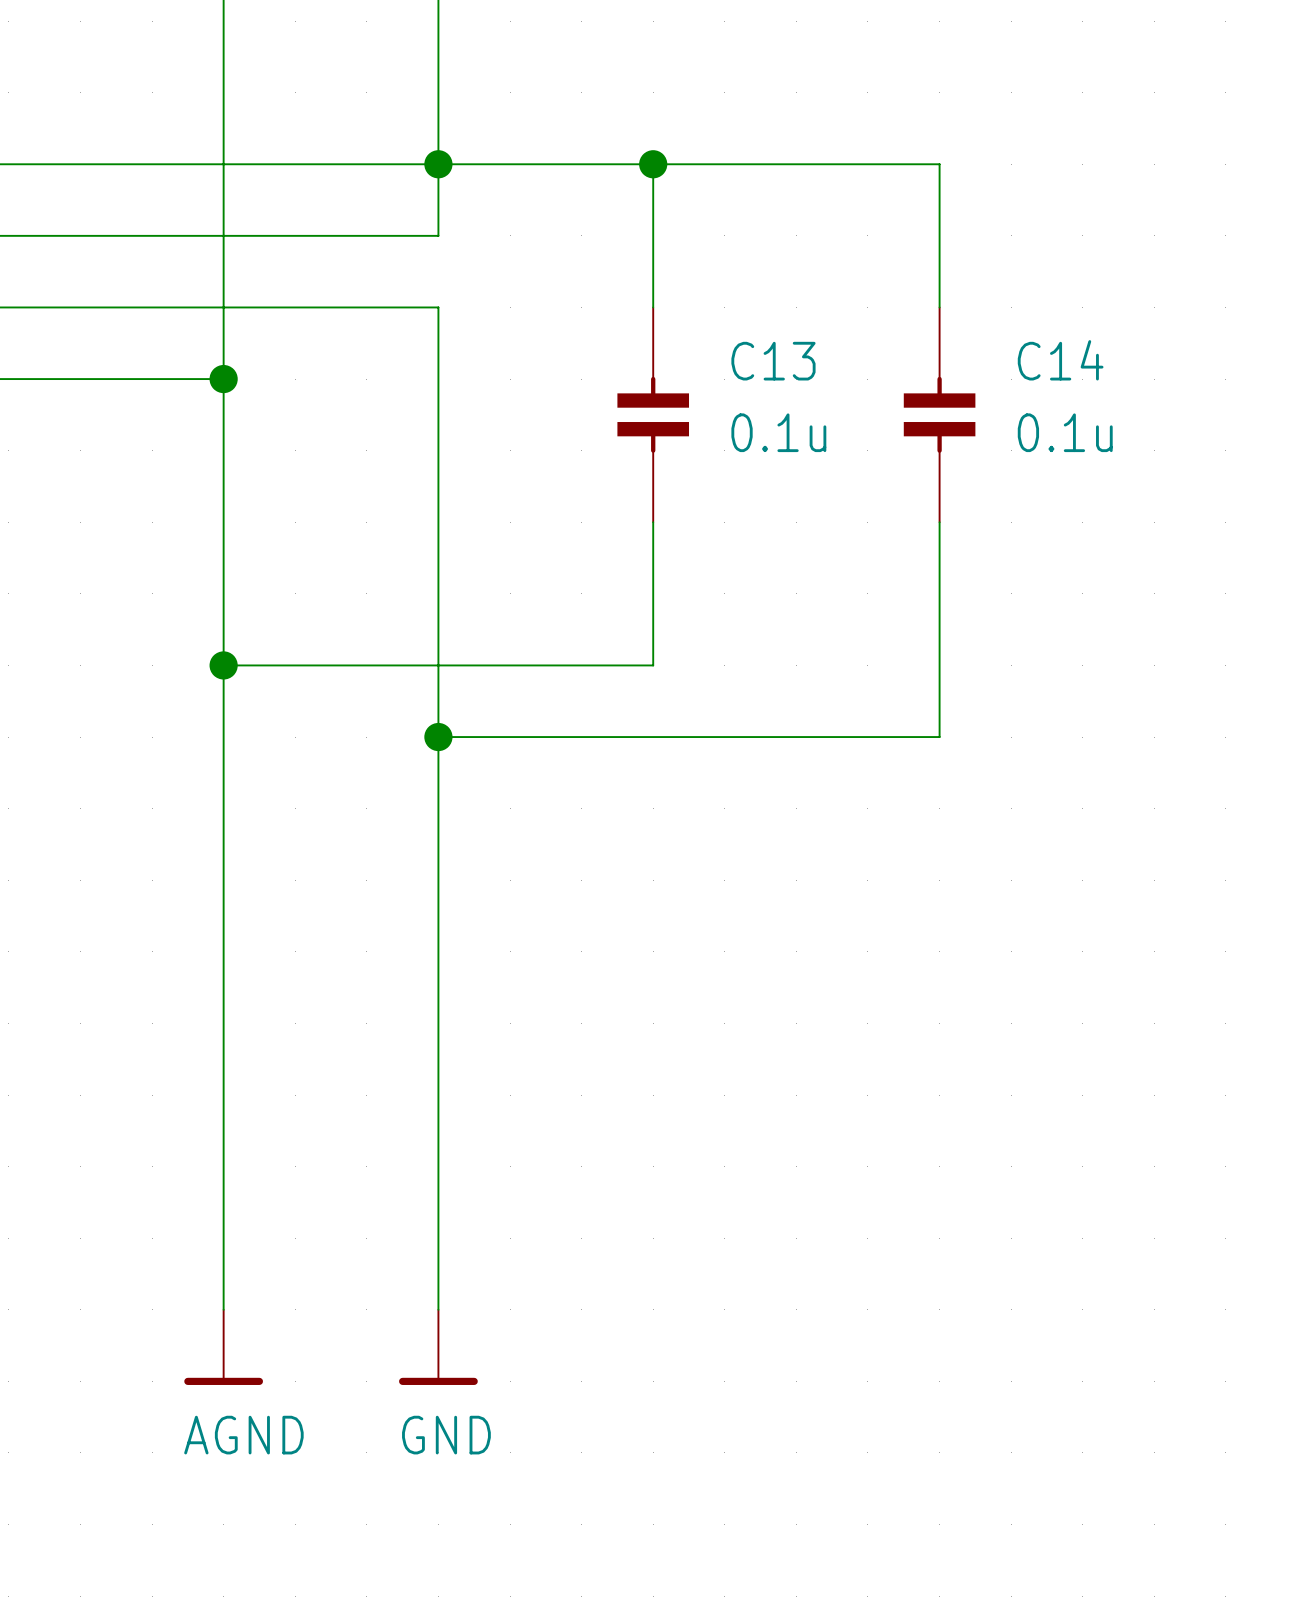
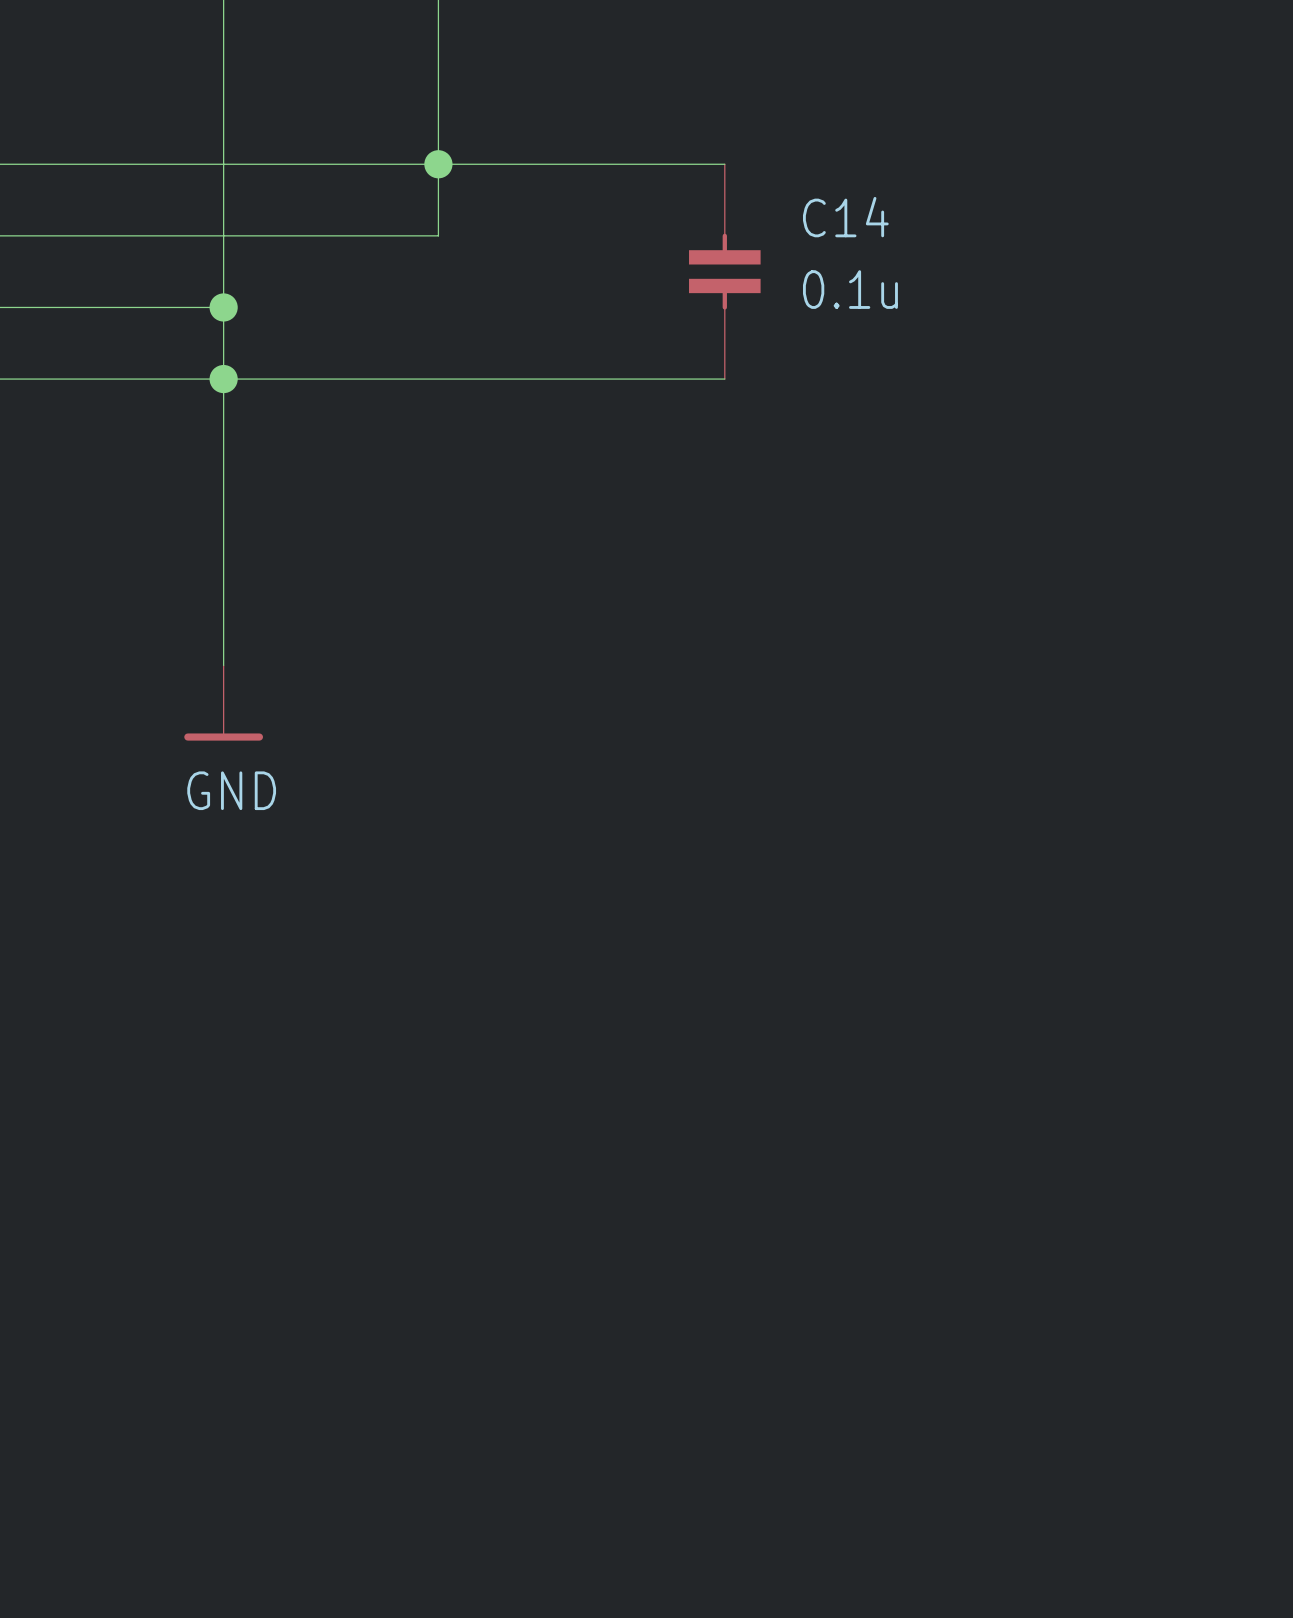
wire: (653, 164) (653, 307) -> none
junction: (653, 164) -> none
wire: (724, 164) (939, 164) (939, 307) -> none
wire: (223, 307) (438, 307) (438, 1309) -> none
junction: none -> (223, 307)
wire: none -> (223, 379) (724, 379)
C13: 0.1u (653, 414) -> none
C14 position: (939, 414) -> (724, 271)
wire: (653, 522) (653, 665) (223, 665) (223, 1309) -> none
wire: (939, 522) (939, 737) (438, 737) -> none
junction: (223, 665) -> none
junction: (438, 737) -> none
power symbol: AGND (223, 1347) -> none
power symbol position: GND (438, 1347) -> GND (223, 703)

